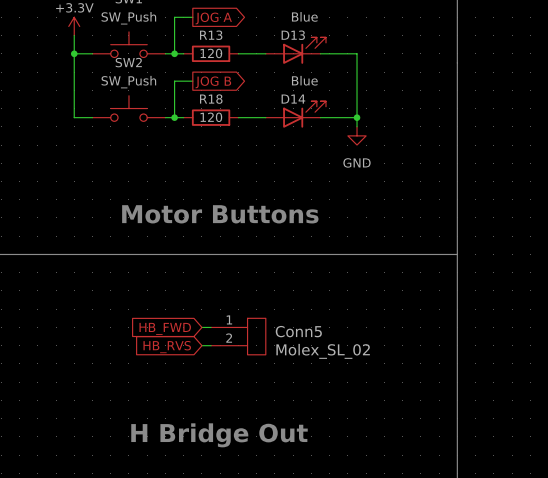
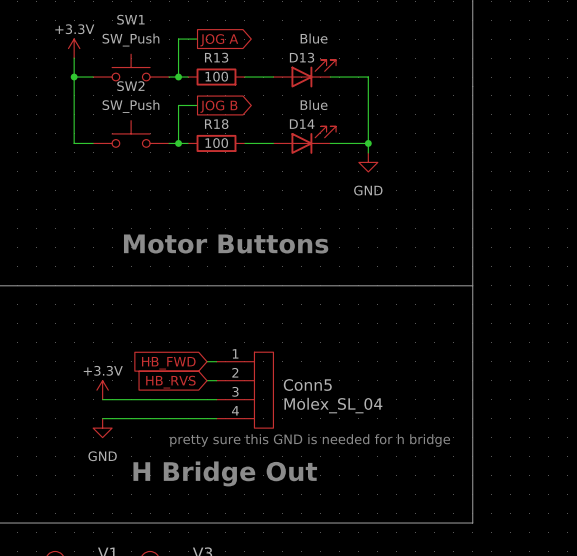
R13 value: 120 (211, 53) -> 100 (216, 76)
R18 value: 120 (211, 117) -> 100 (216, 143)
Conn5 symbol: [211, 318, 266, 355] -> [216, 352, 274, 429]
Conn5 value: Molex_SL_02 (323, 351) -> Molex_SL_04 (333, 405)
power symbol: none -> +3.3V (102, 390)
wire: none -> (102, 399) (216, 399)
wire: none -> (102, 418) (216, 418)
power symbol: none -> GND (102, 428)
text: none -> pretty sure this GND is needed for h bridge (310, 440)

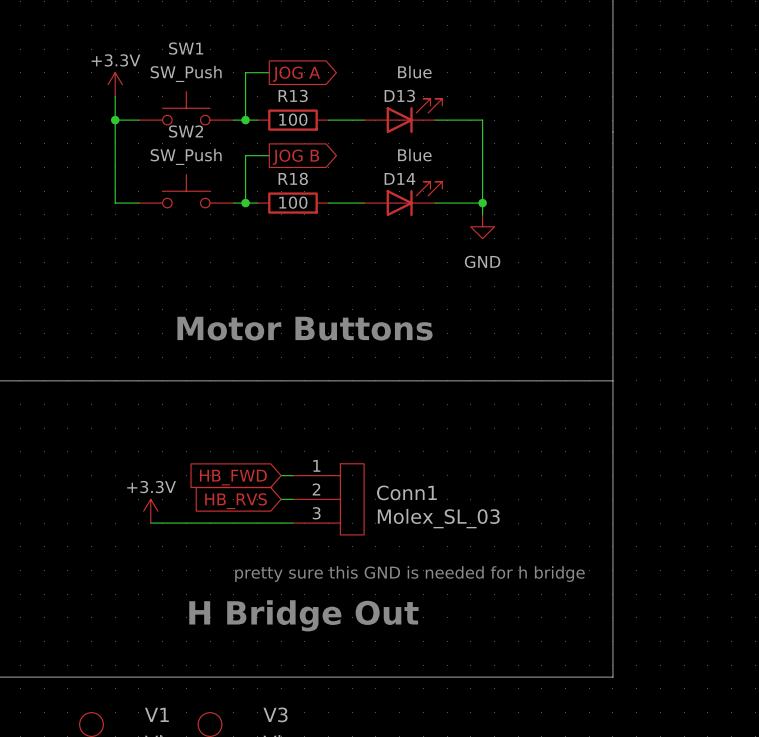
Conn1: none -> Molex_SL_03 (328, 499)
Conn5: Molex_SL_04 (244, 390) -> none
wire: (102, 418) (216, 418) -> none
power symbol: GND (102, 428) -> none

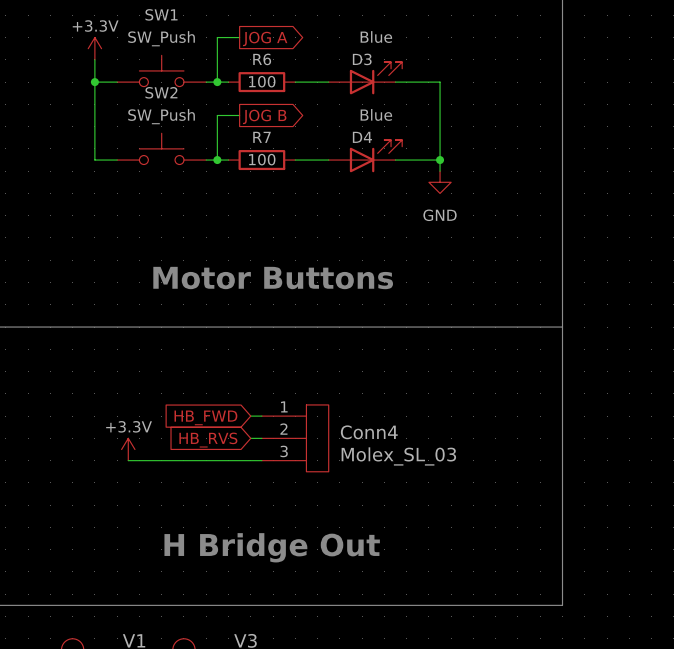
R13 name: R13 (293, 95) -> R6 (262, 59)
D13 name: D13 (399, 95) -> D3 (362, 59)
R18 name: R18 (293, 178) -> R7 (261, 137)
D14 name: D14 (399, 178) -> D4 (362, 137)
Conn1 name: Conn1 (406, 492) -> Conn4 (369, 432)
text: pretty sure this GND is needed for h bridge (409, 574) -> none

